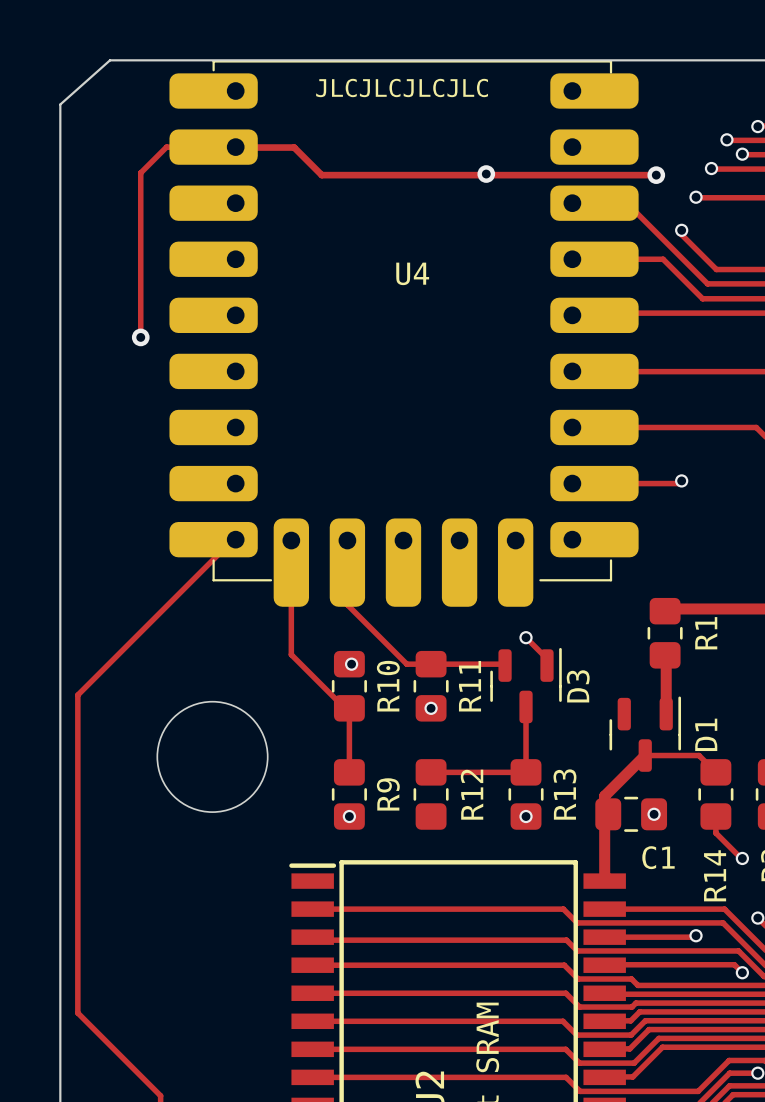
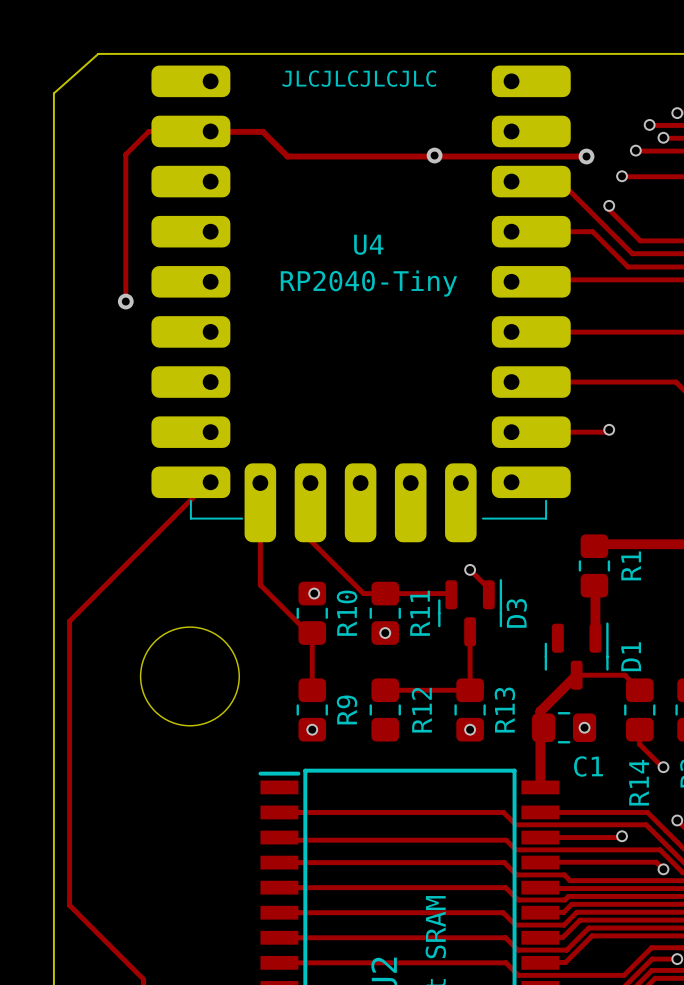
U4 footprint: [169, 60, 639, 607] -> [151, 65, 571, 543]
U4 value: none -> RP2040-Tiny (368, 283)

